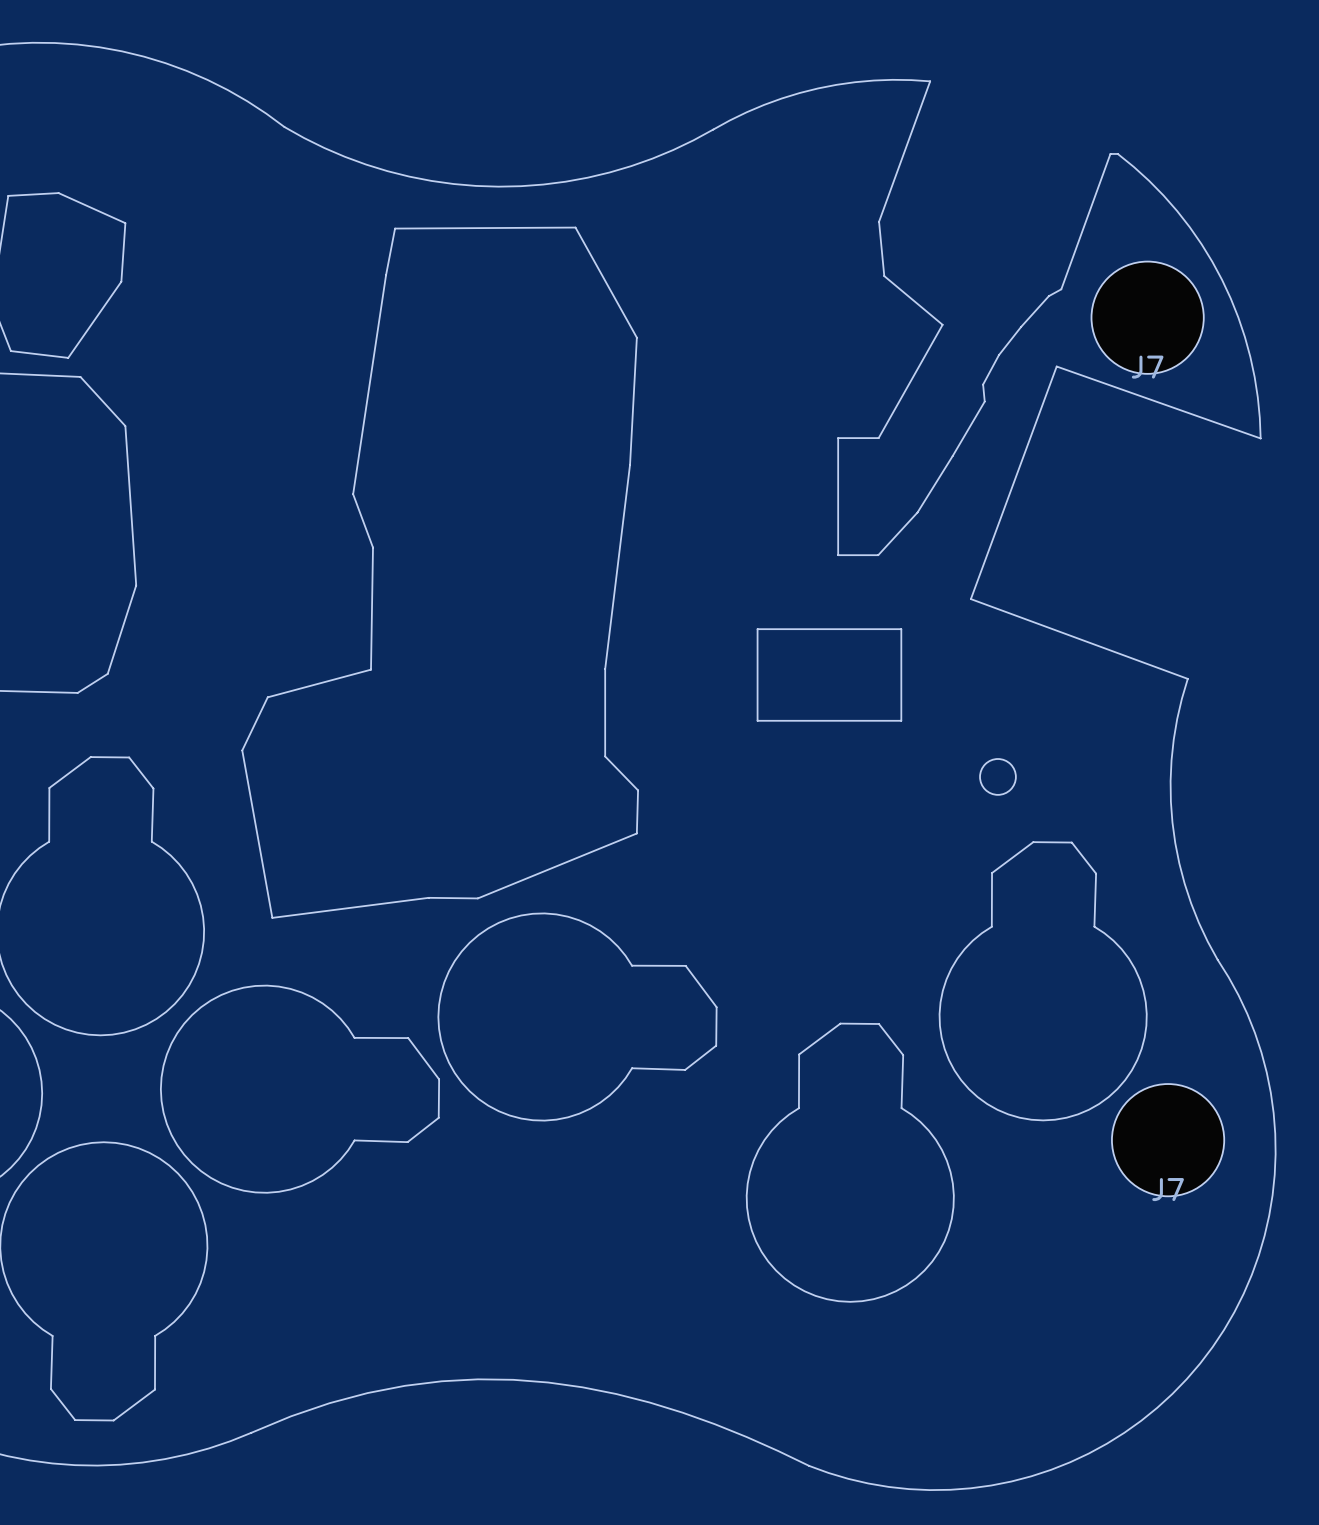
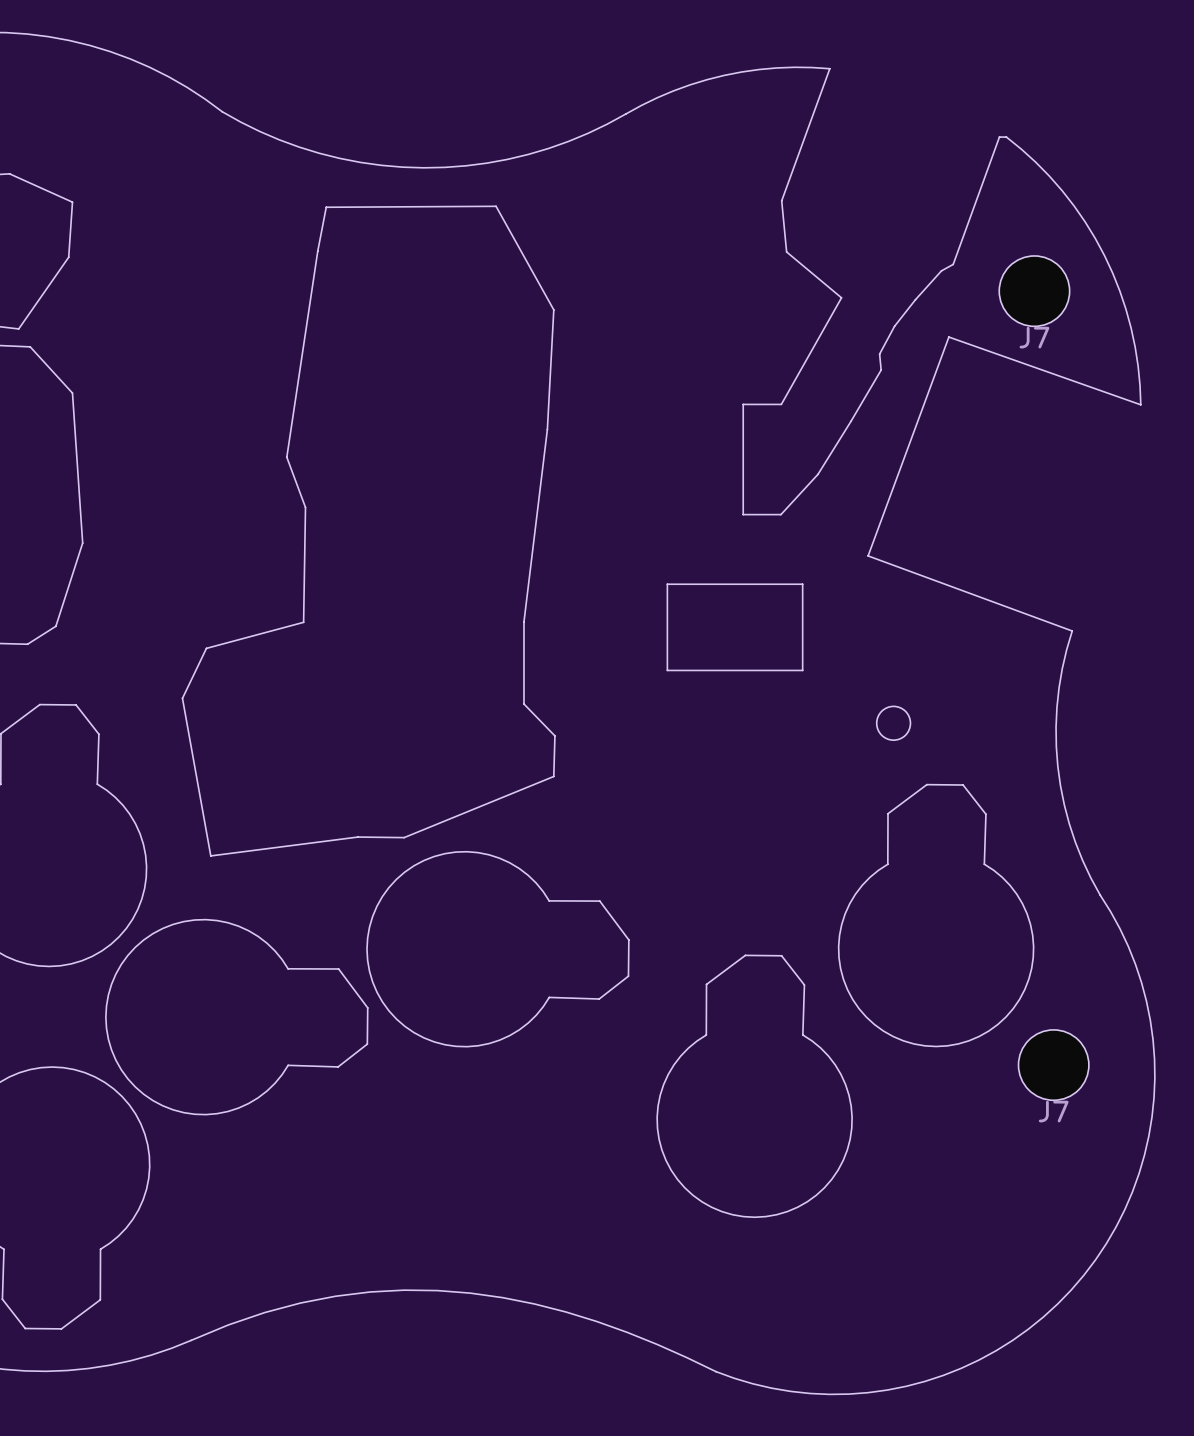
J7 footprint: [1091, 261, 1204, 374] -> [999, 255, 1070, 327]
J7 footprint: [1111, 1084, 1225, 1197] -> [1018, 1029, 1089, 1101]

